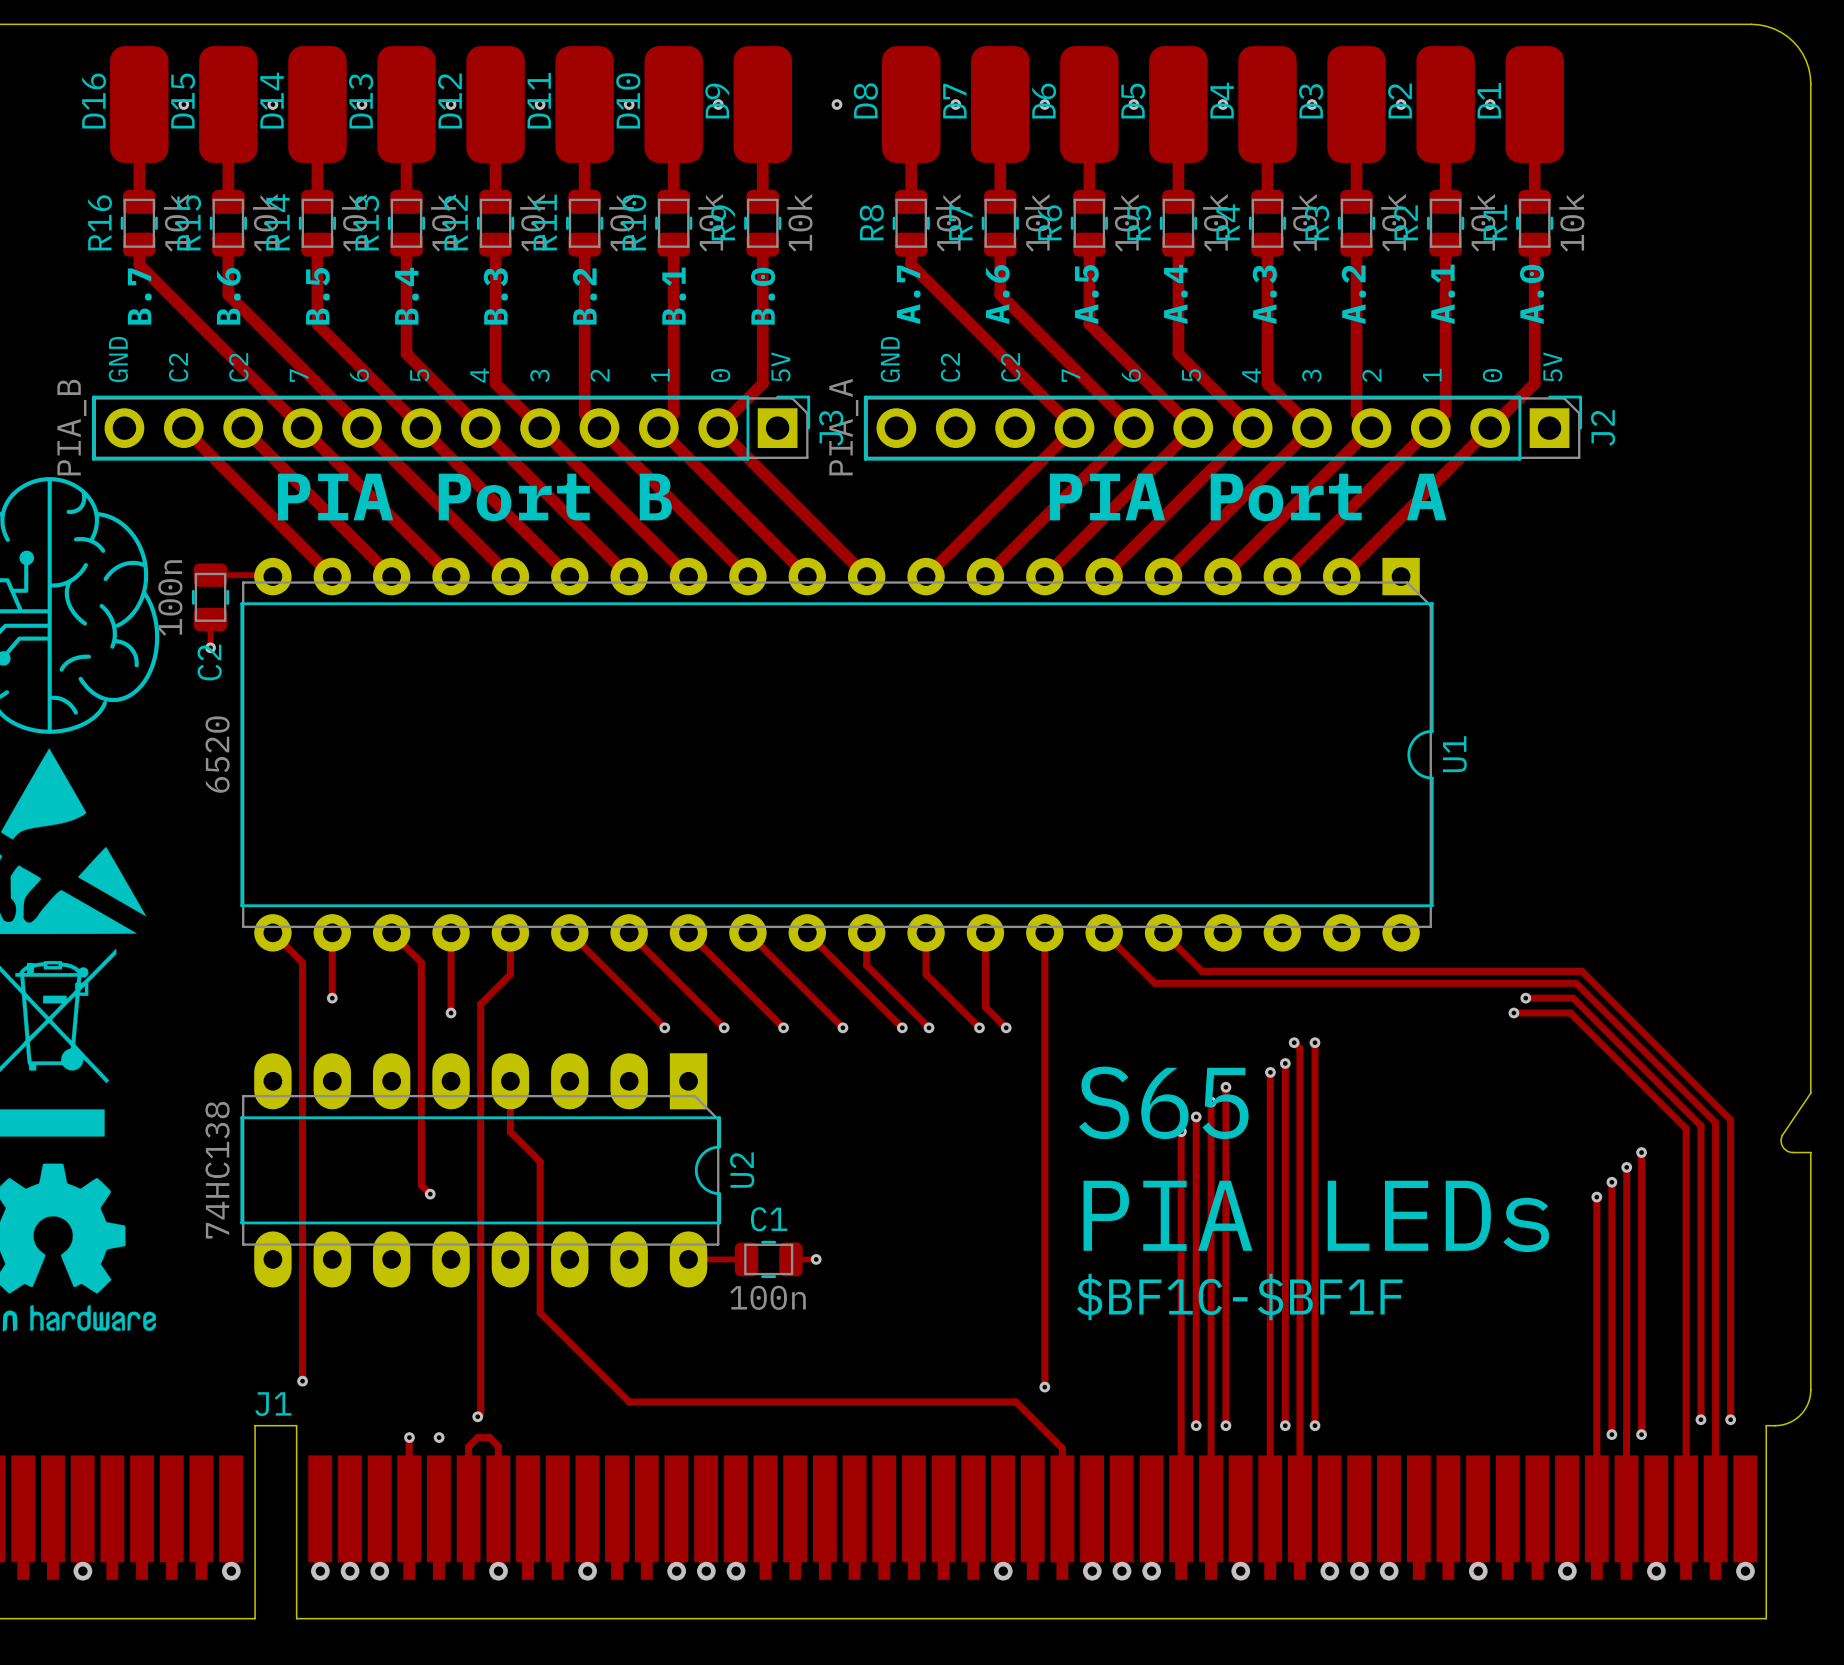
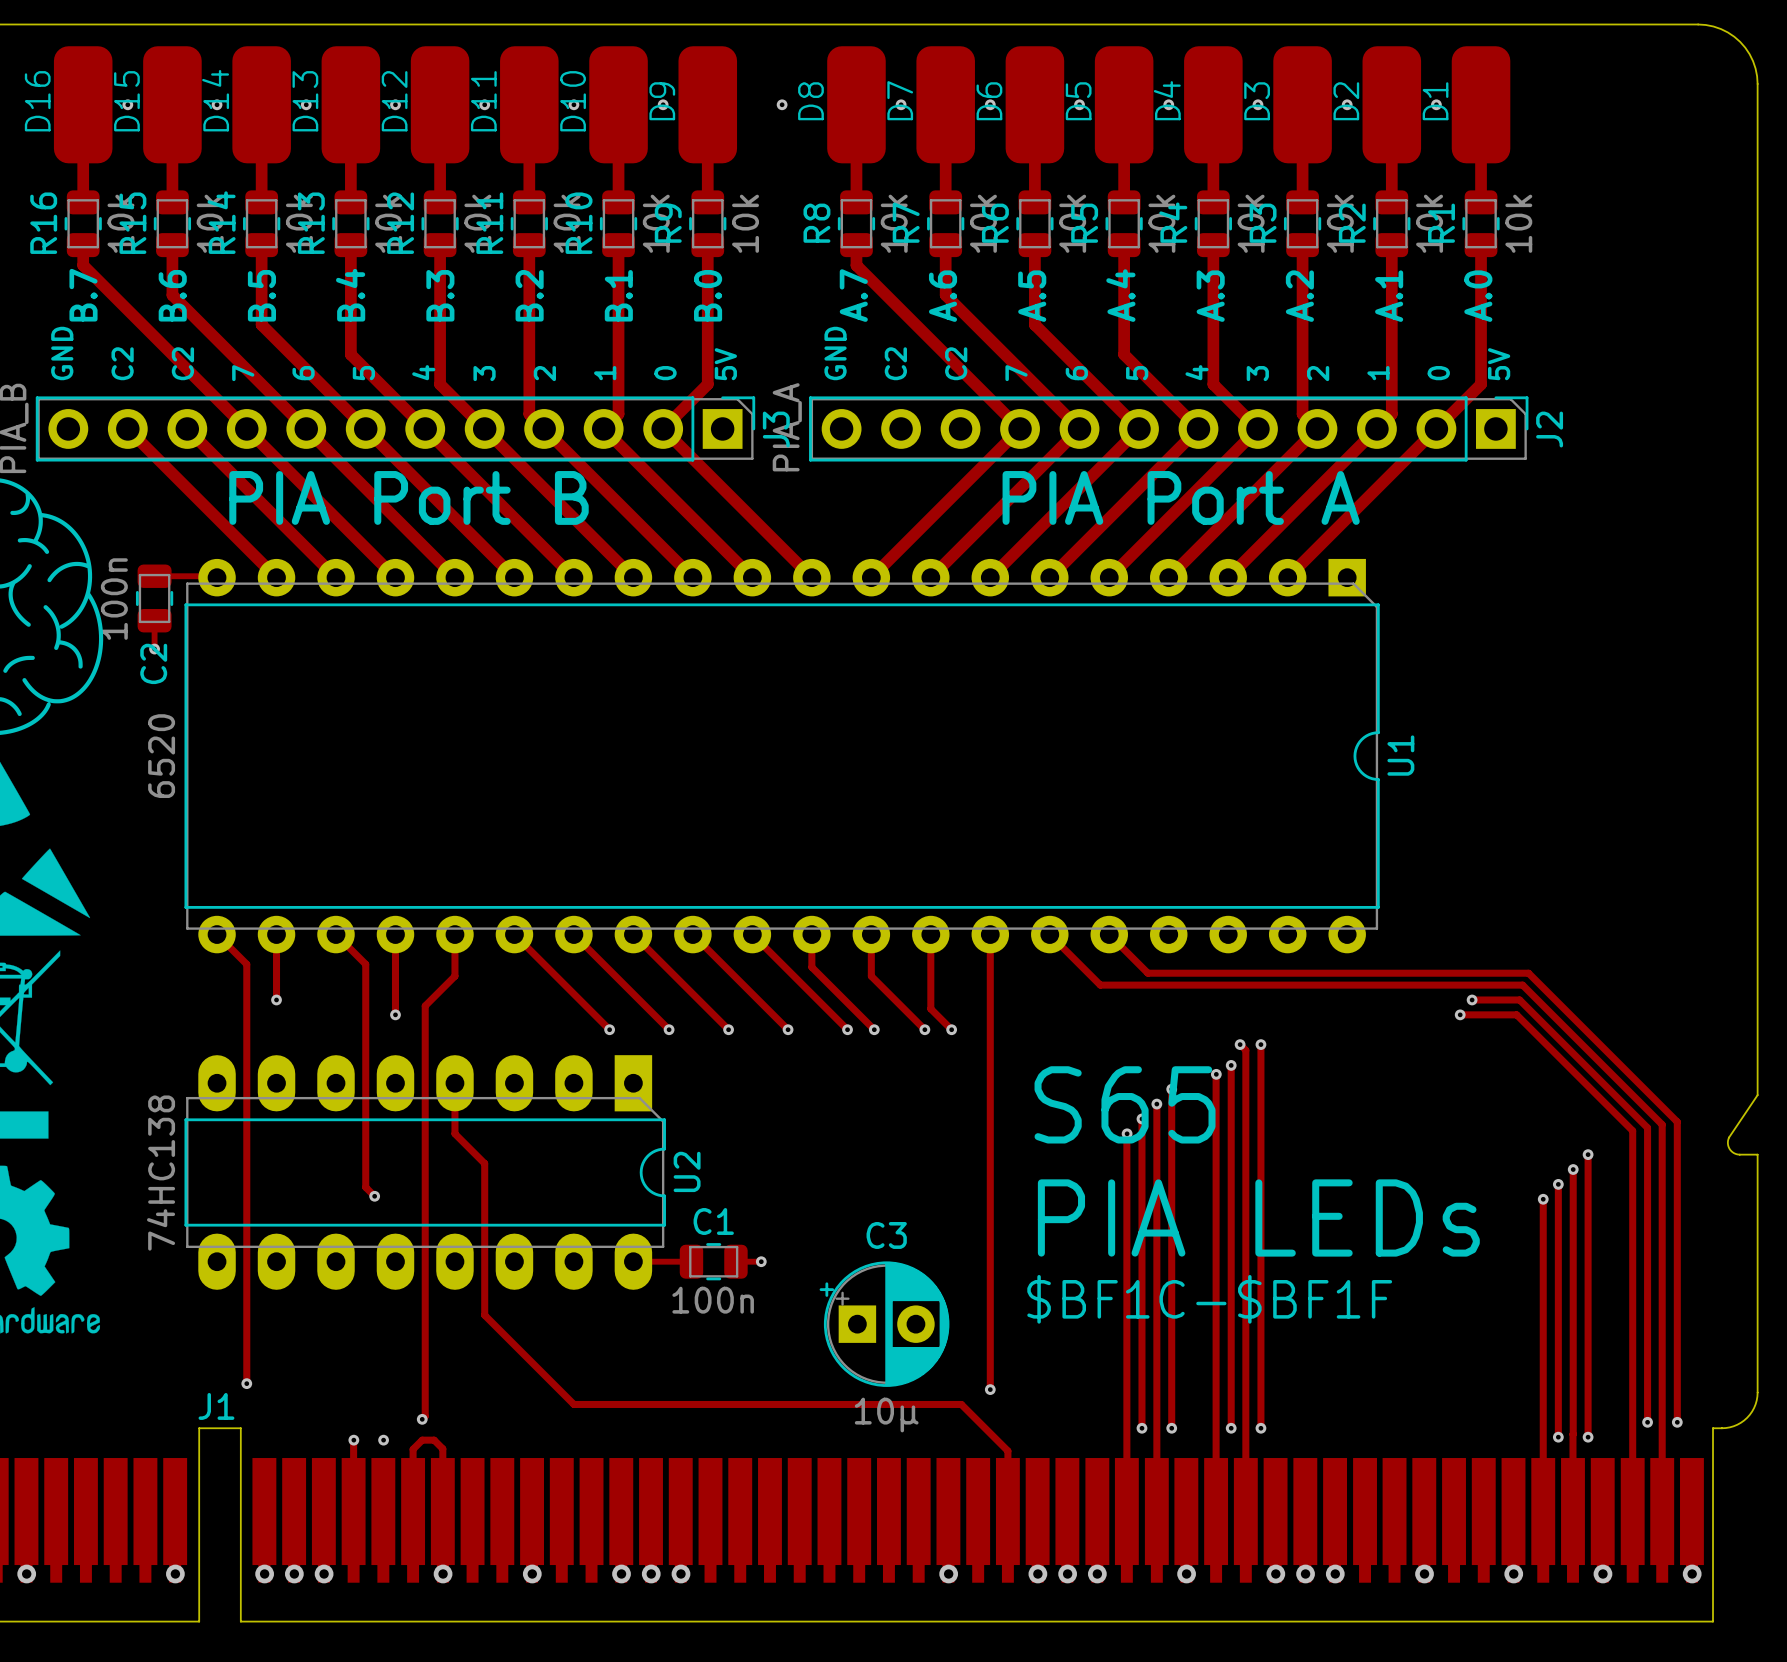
C3: none -> 10µ (884, 1324)

